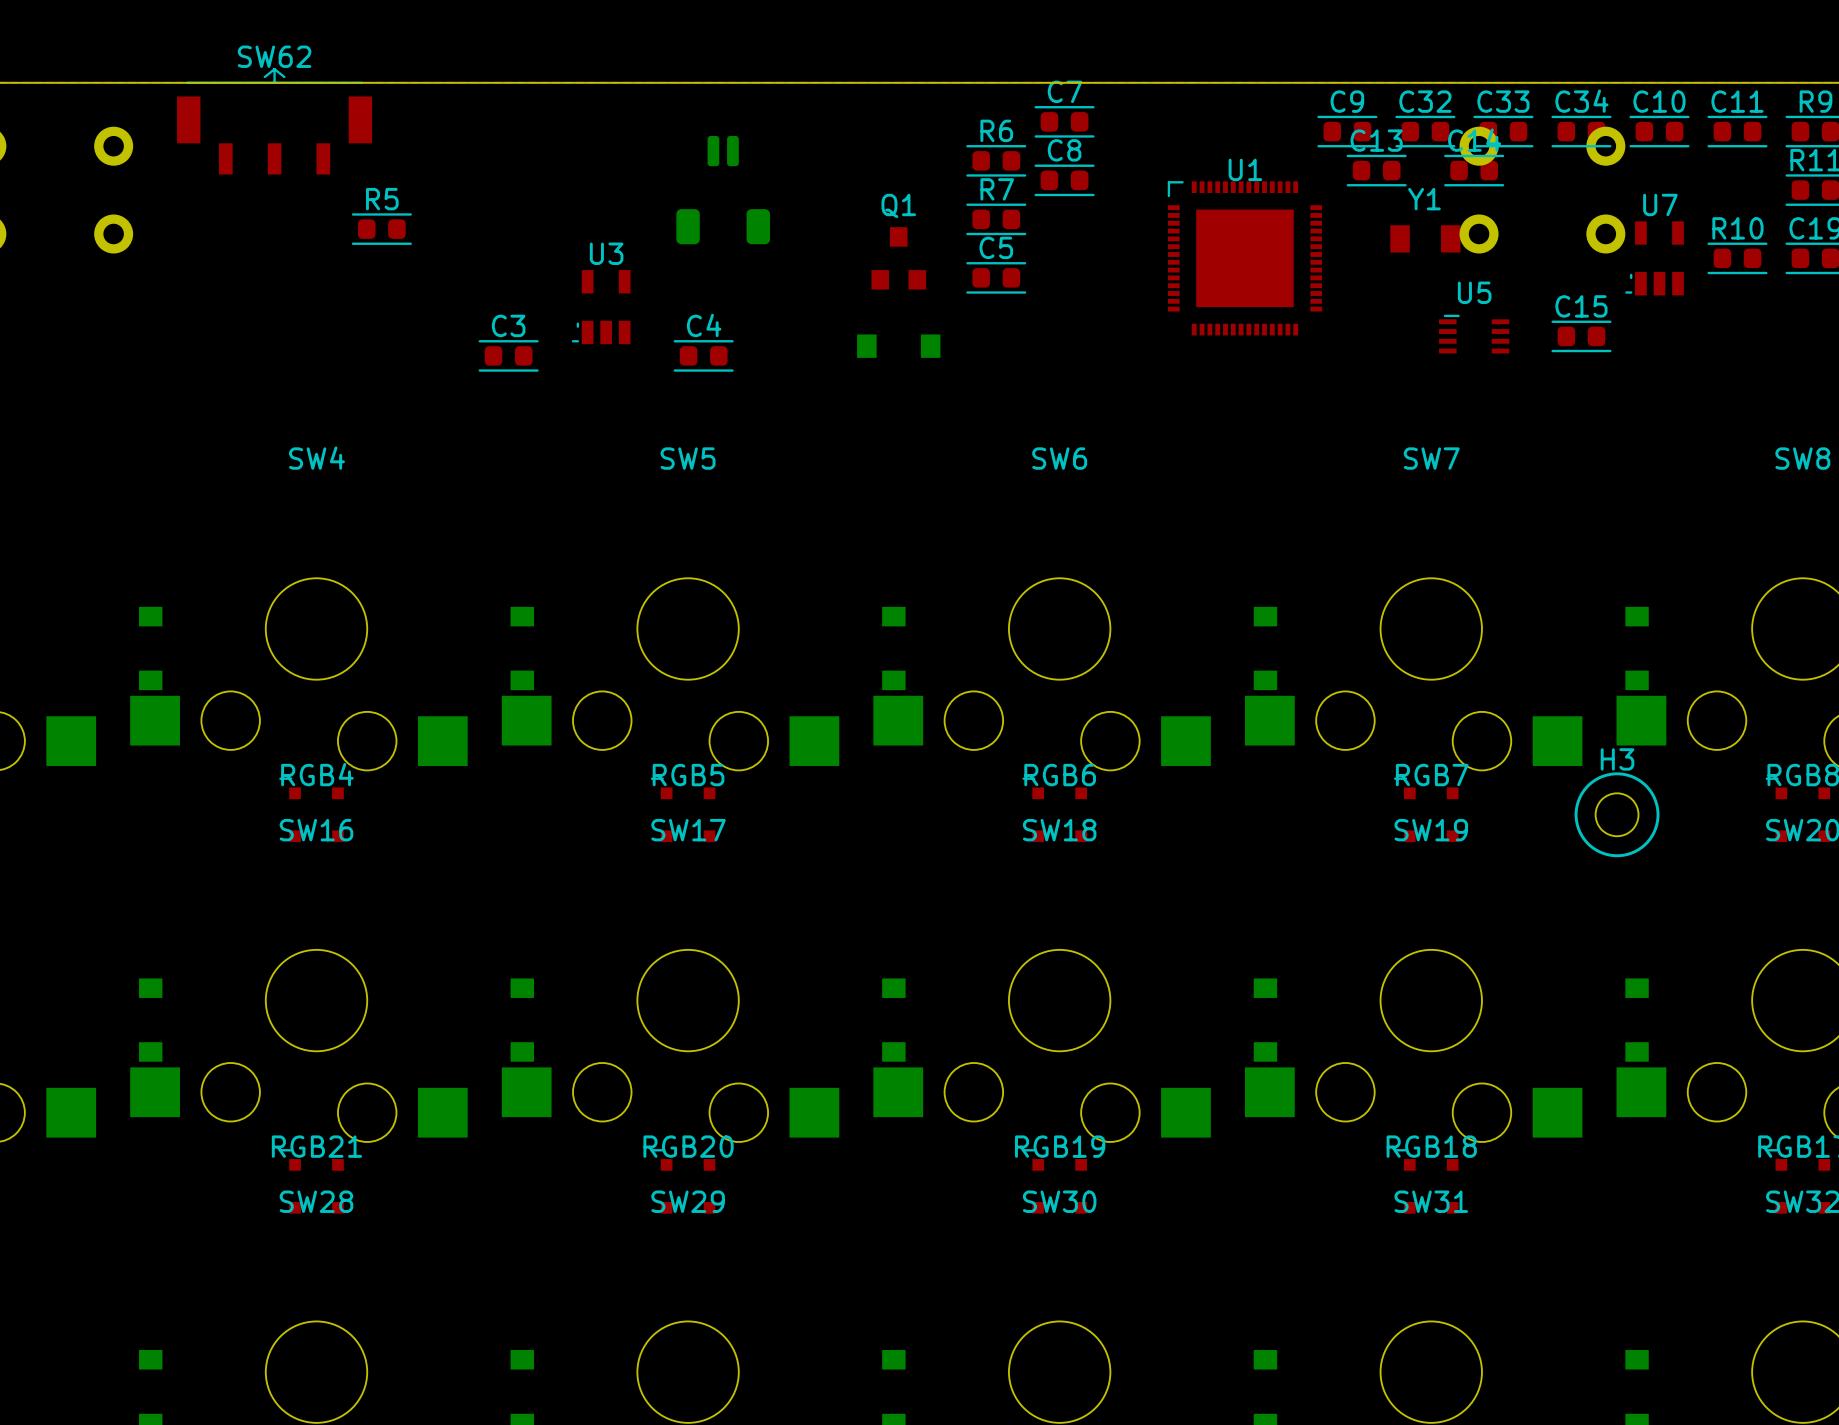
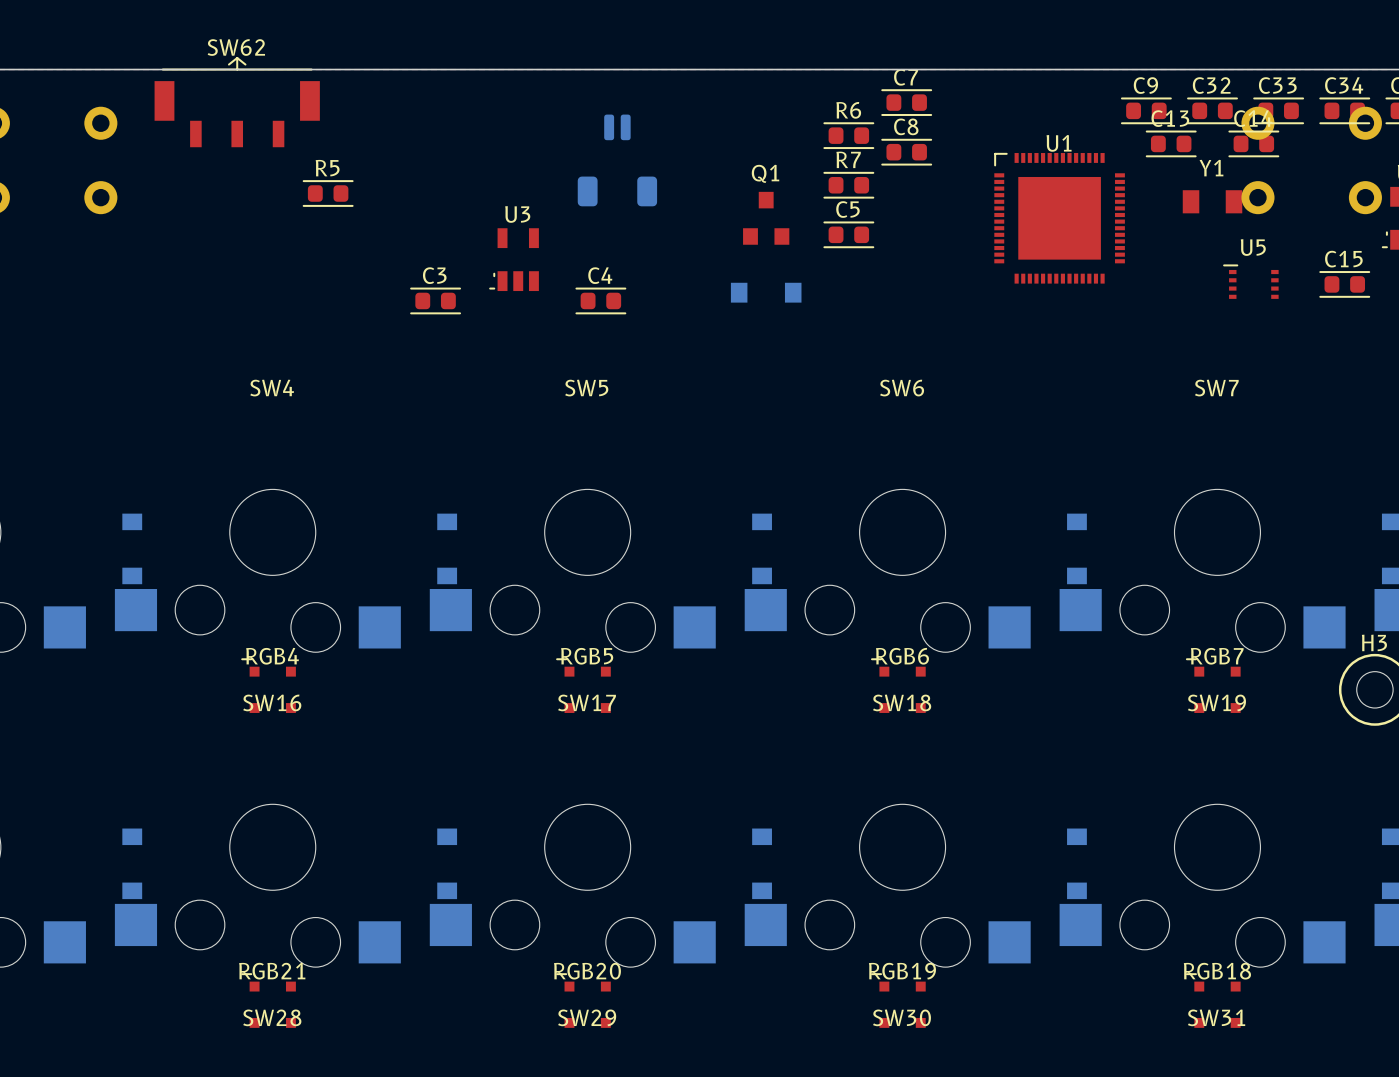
U5 footprint: [1439, 314, 1510, 354] -> [1223, 264, 1279, 299]

